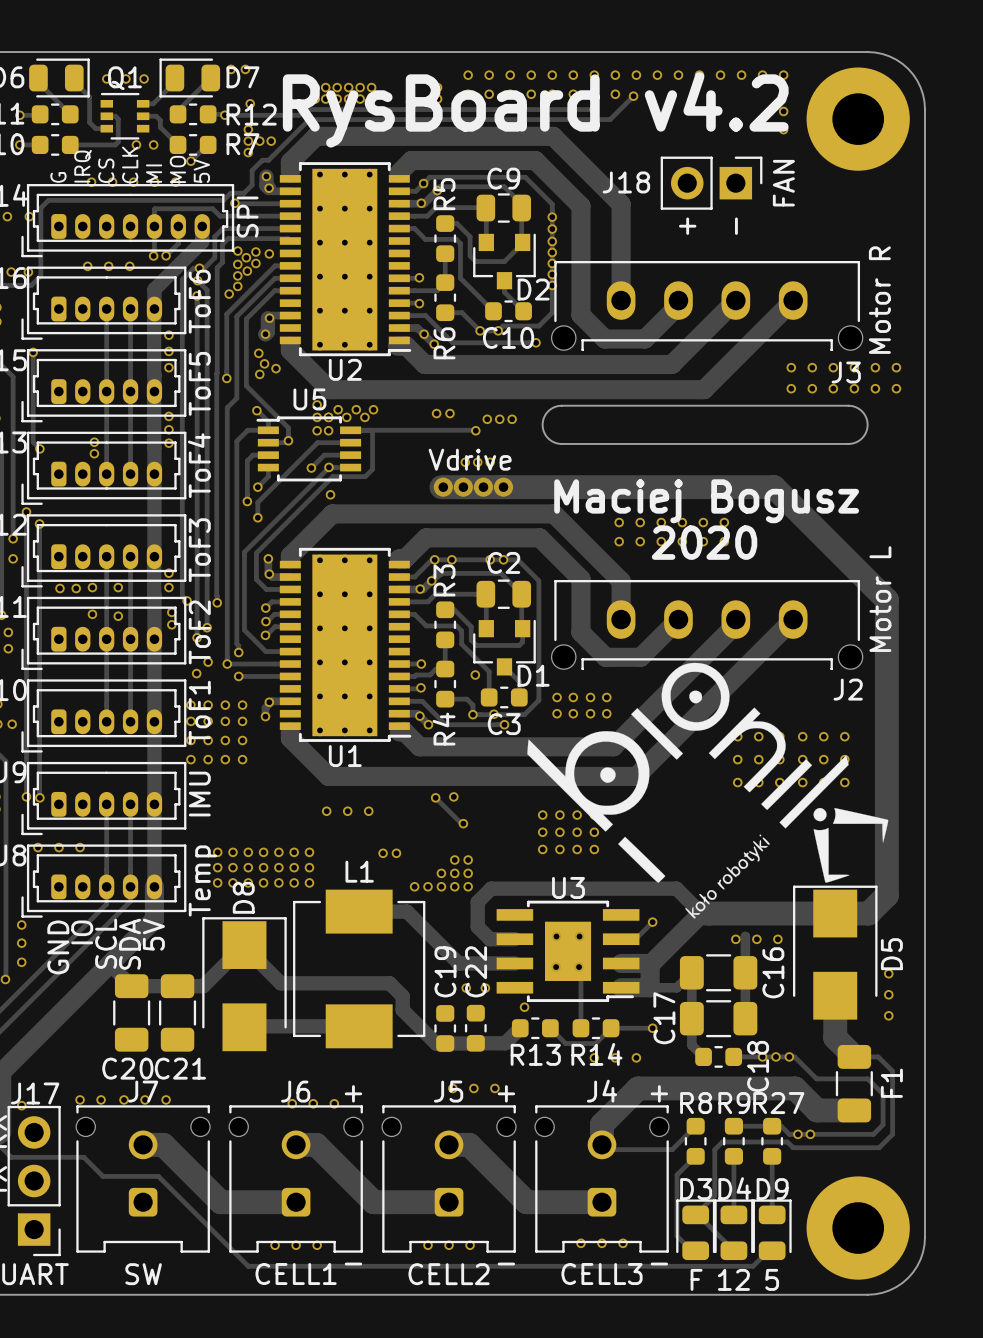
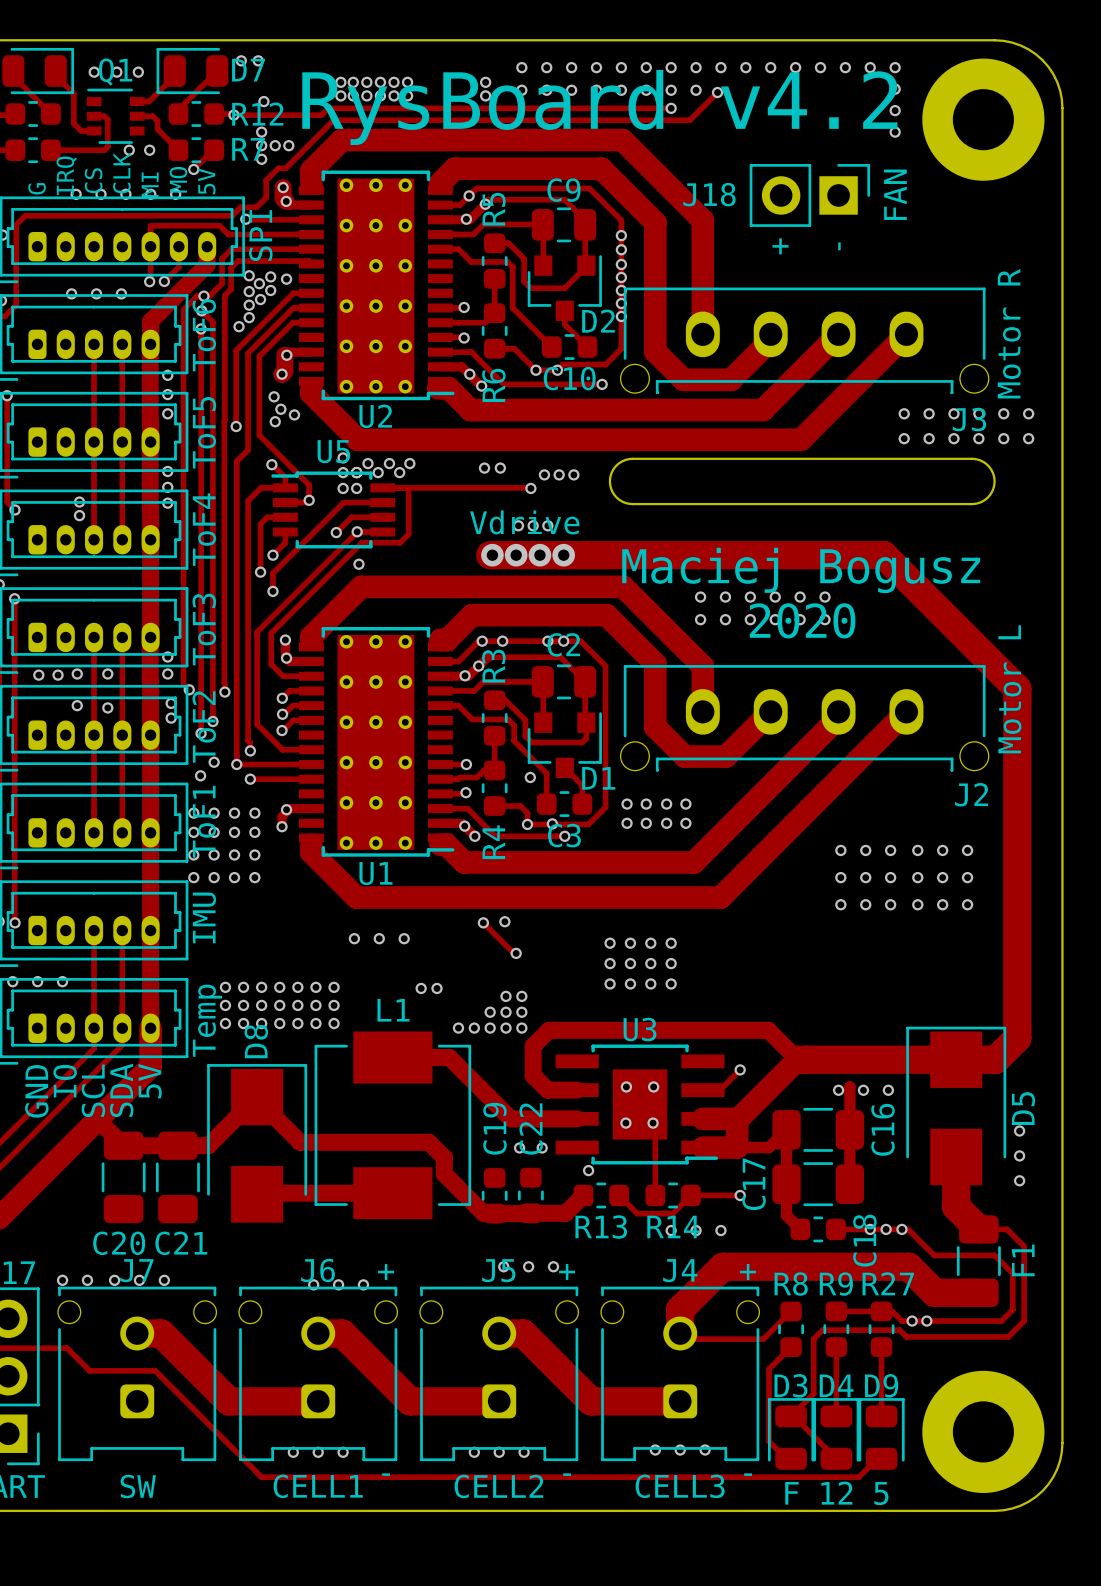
drawing: [527, 662, 889, 919] -> none

